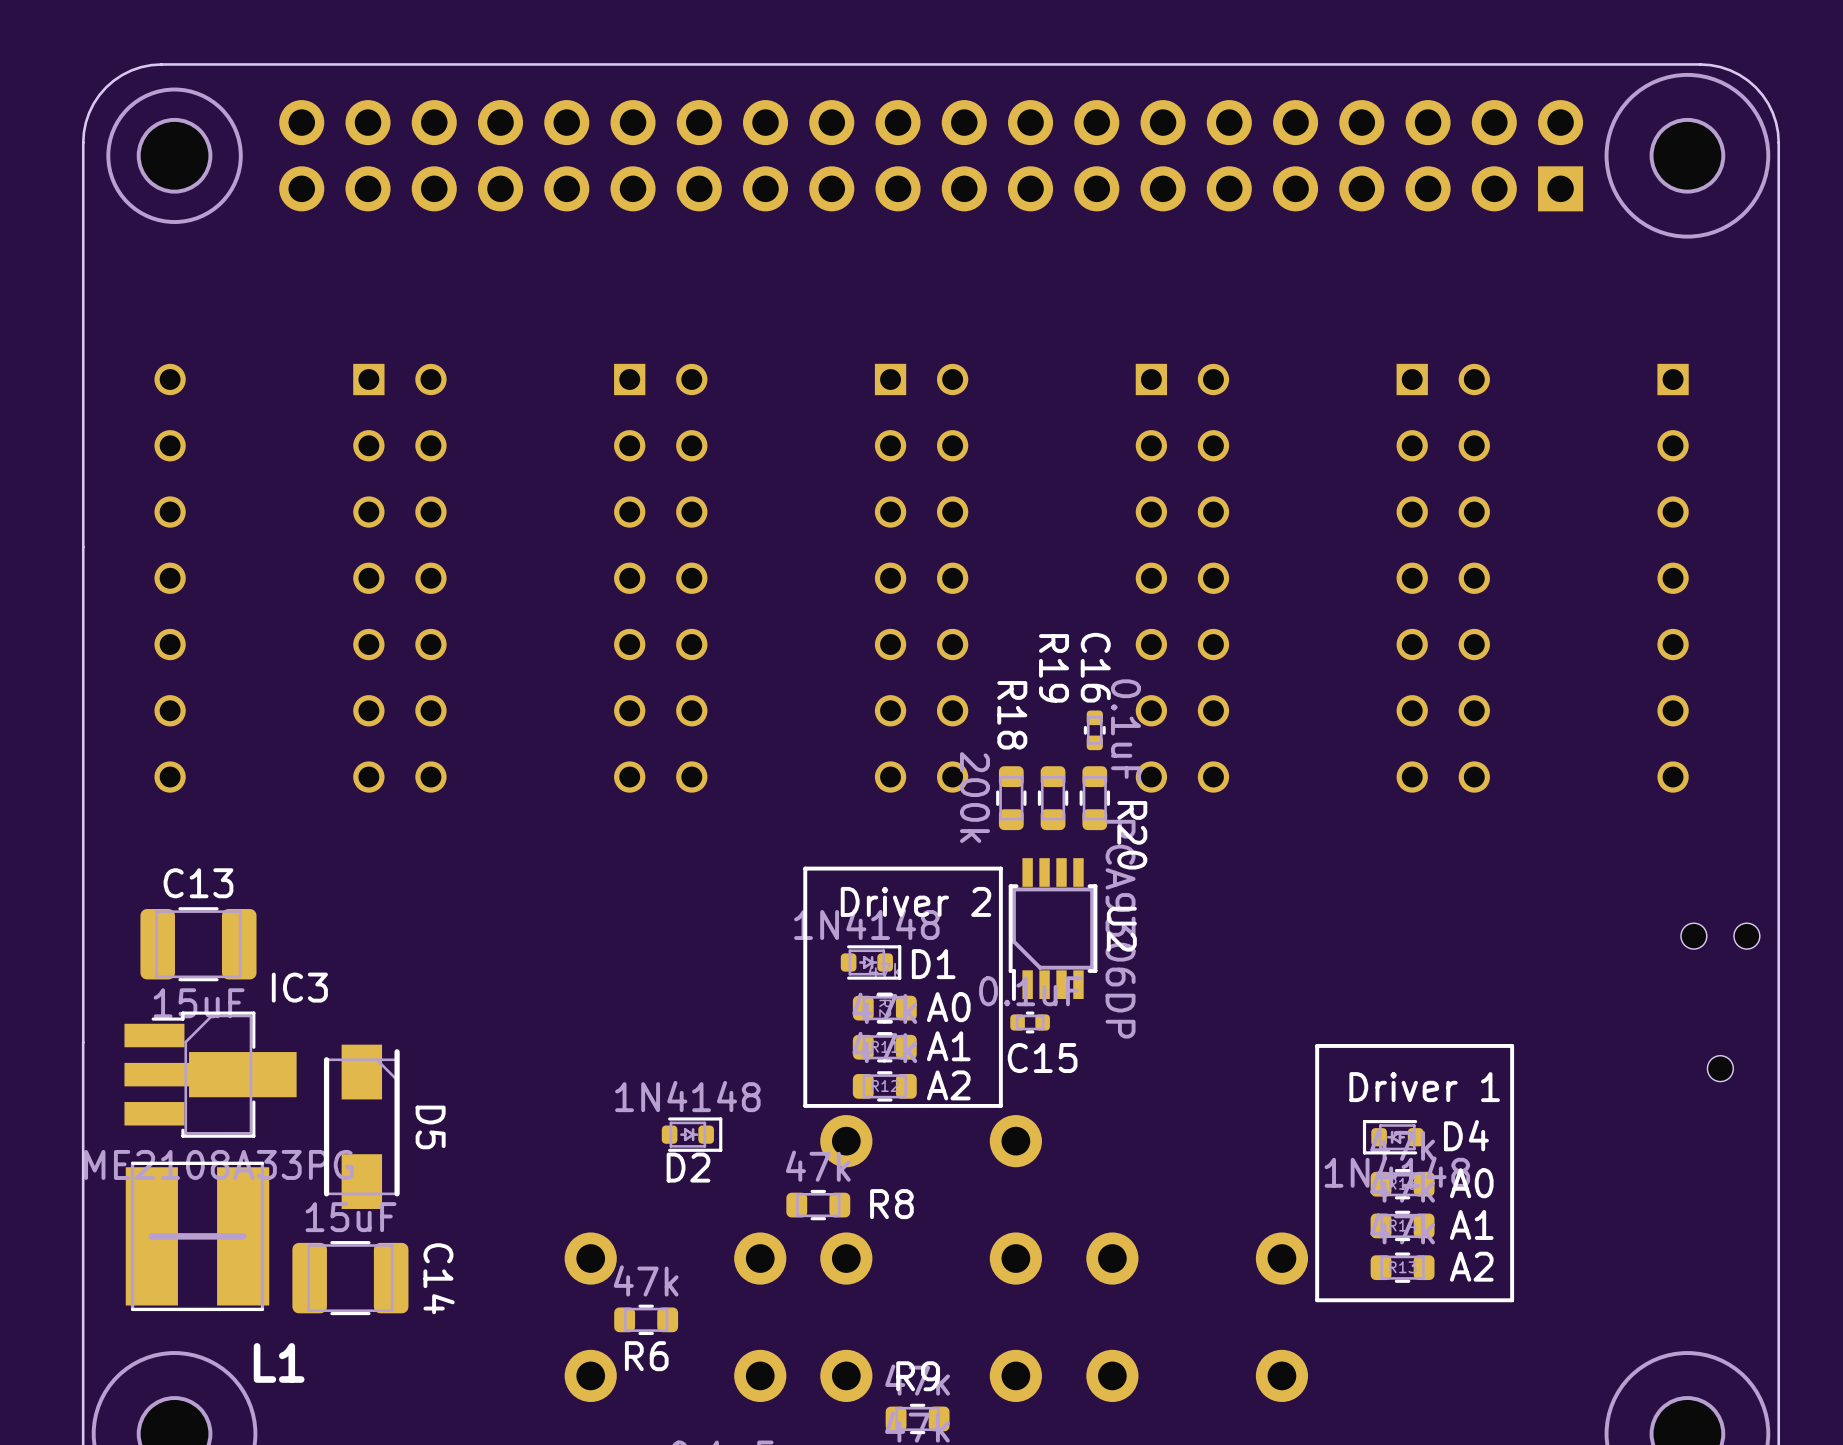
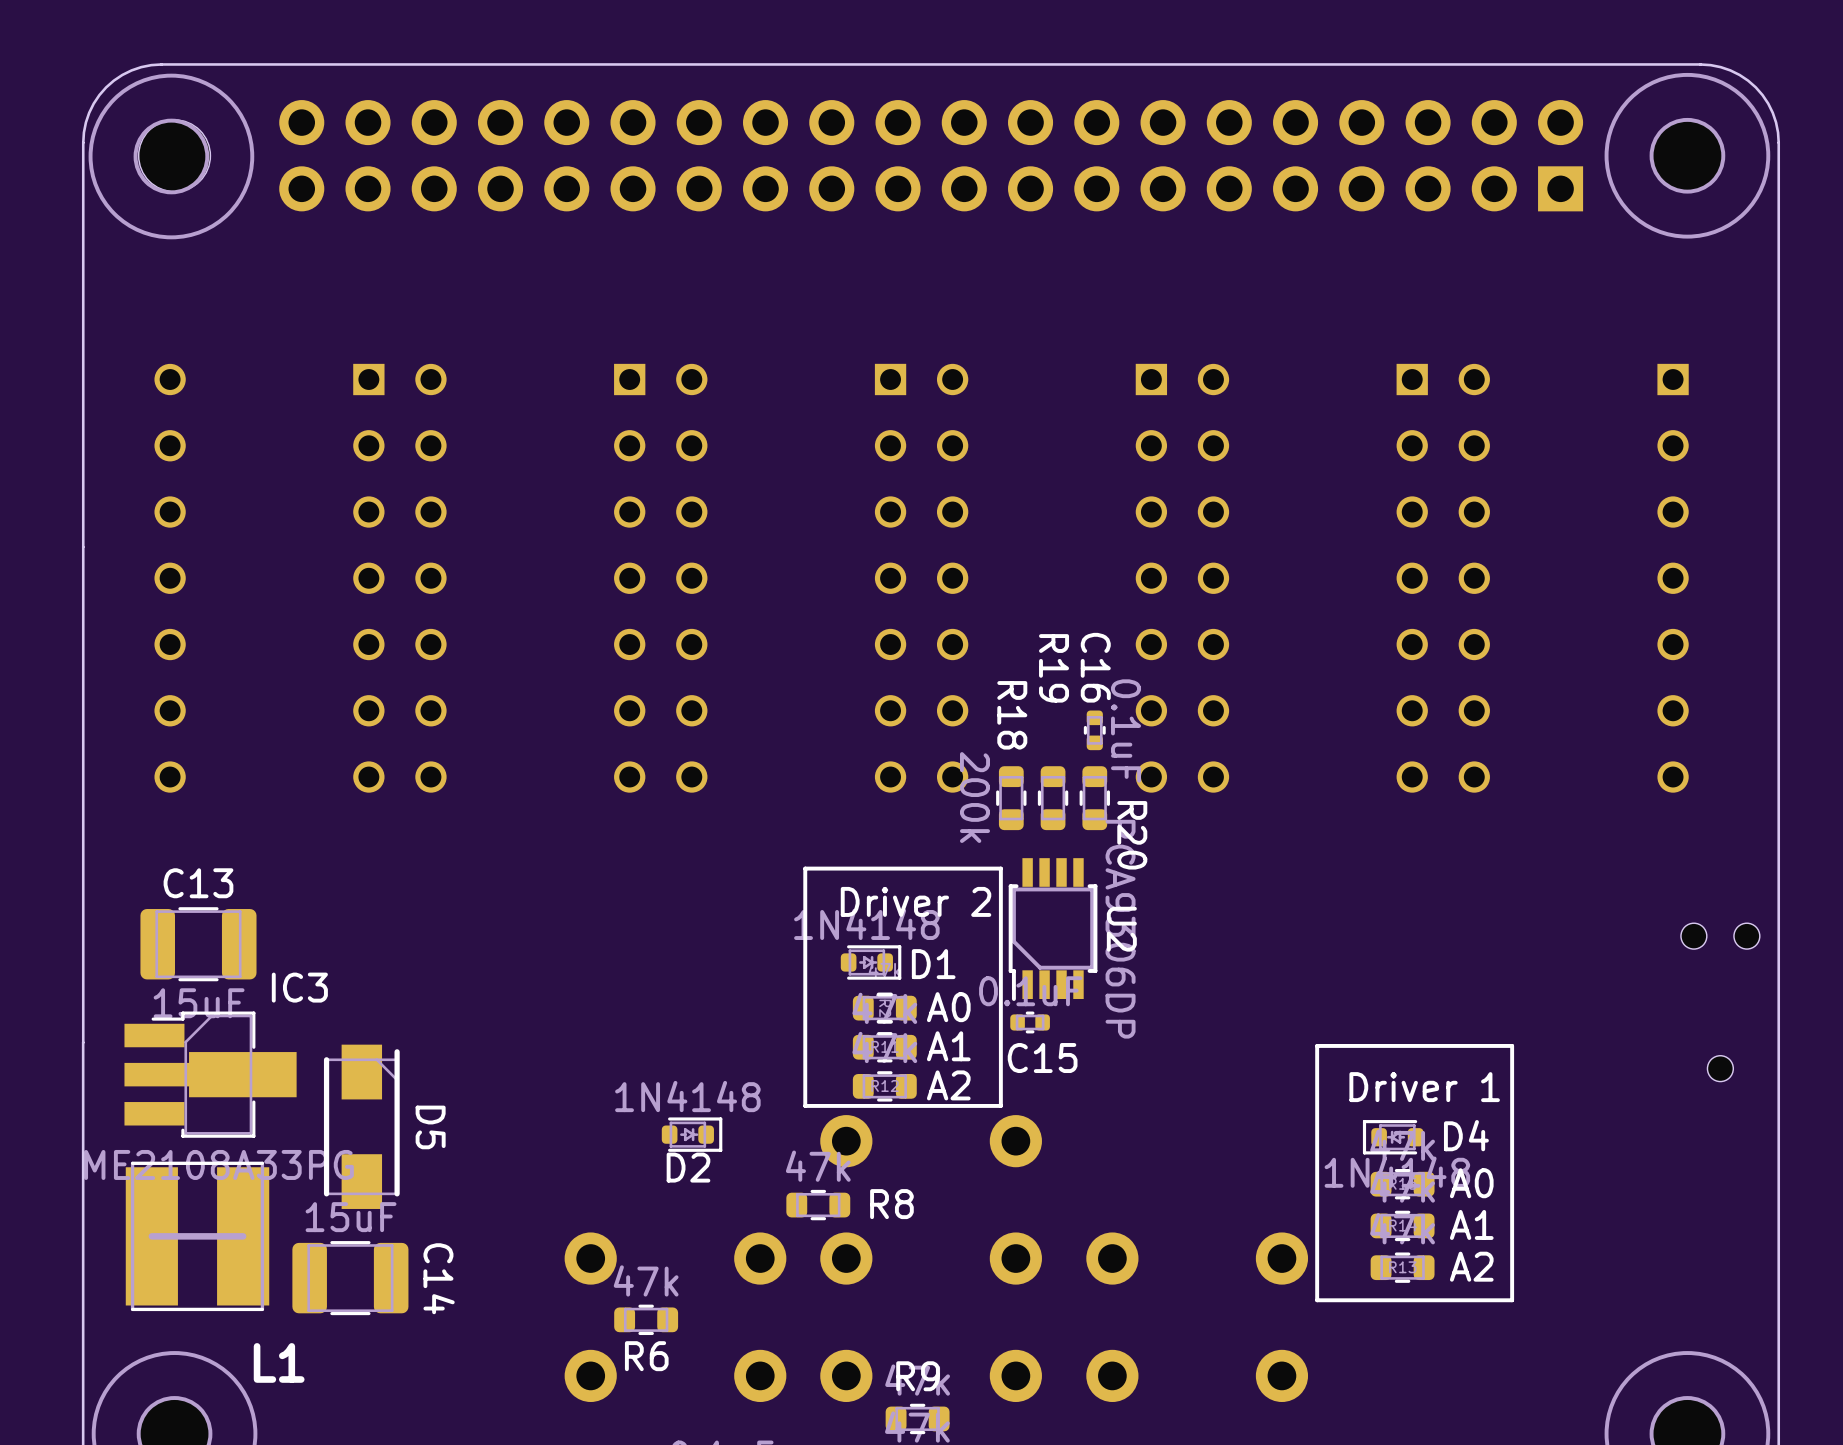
part footprint: [106, 87, 243, 224] -> [88, 73, 255, 240]

